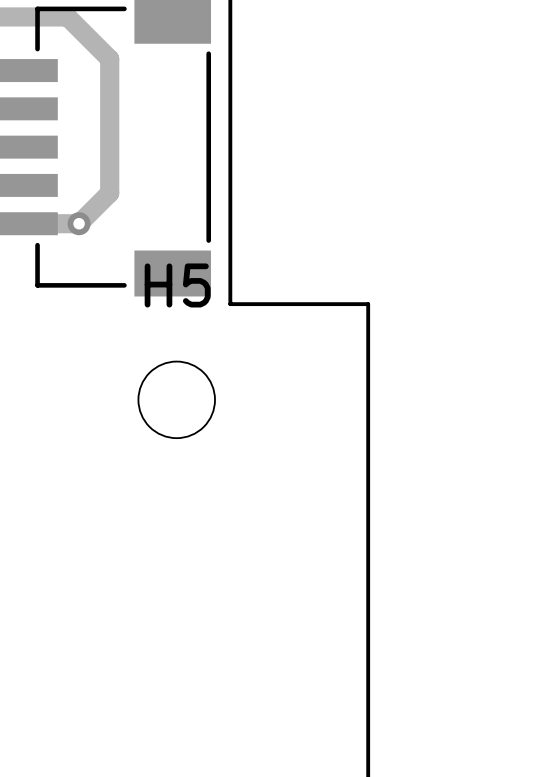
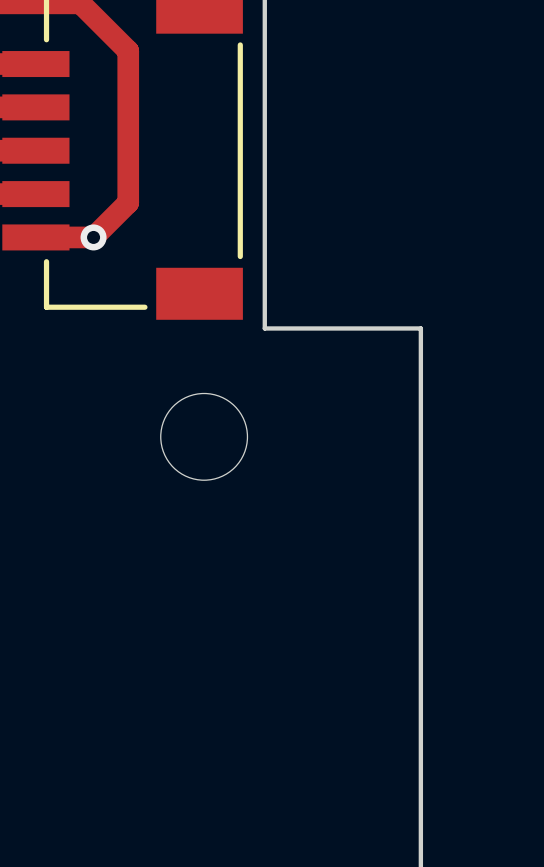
H5 name: H5 (177, 285) -> none

